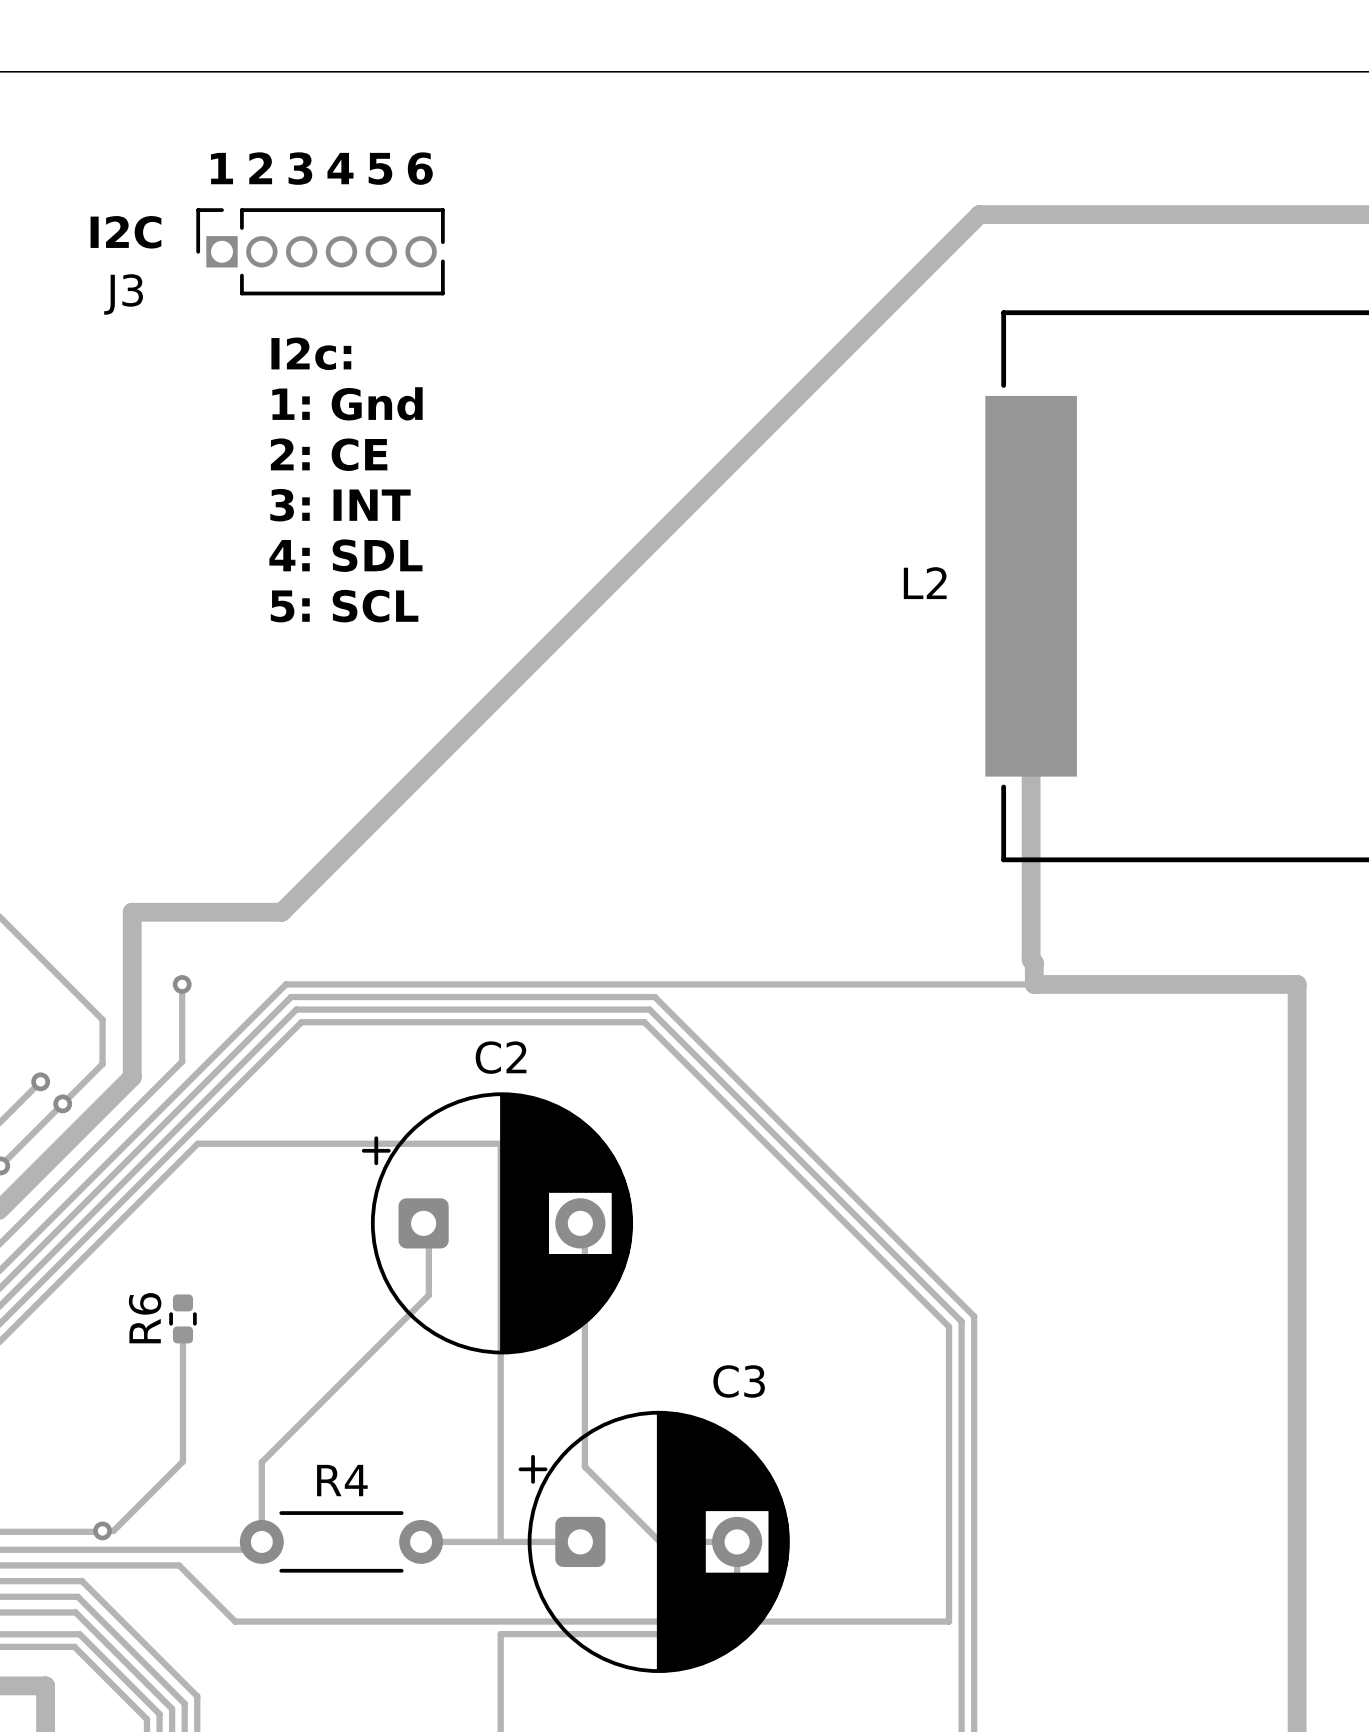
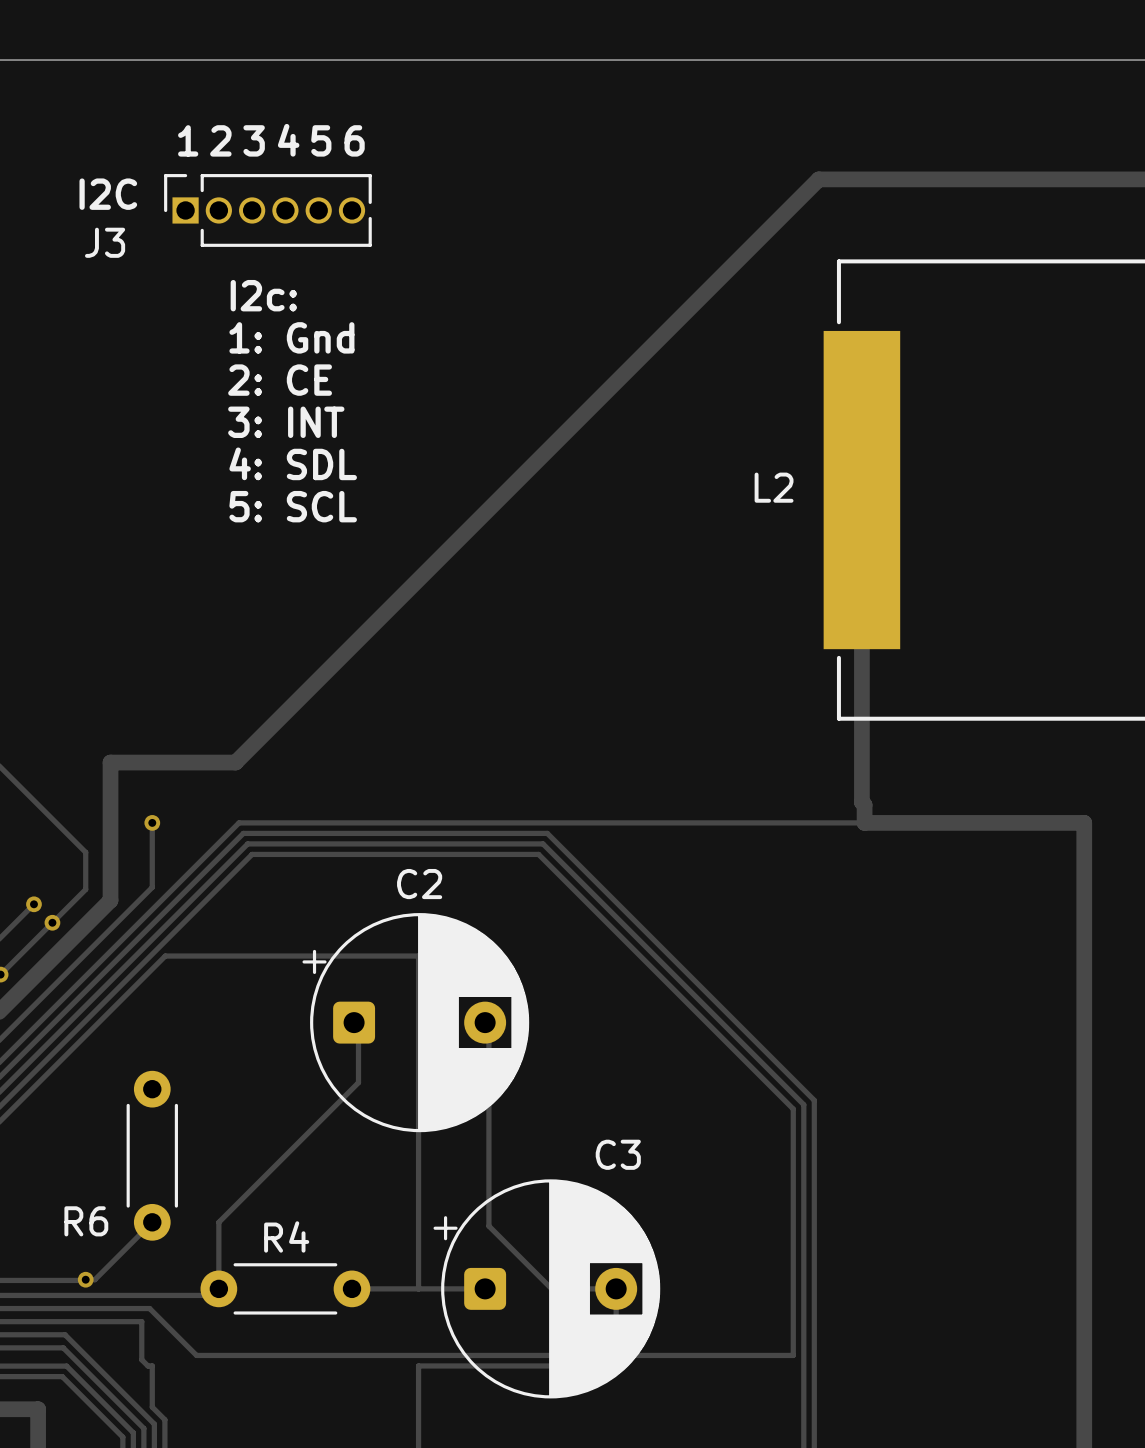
R6 footprint: [169, 1294, 197, 1344] -> [126, 1070, 178, 1241]
R6 name position: R6 (145, 1318) -> R6 (86, 1221)
track: (182, 1334) (182, 1462) -> none
track: (82, 1581) (197, 1698) -> (68, 1321) (141, 1321) (141, 1359) (147, 1365) (152, 1365) (152, 1407) (164, 1419)

